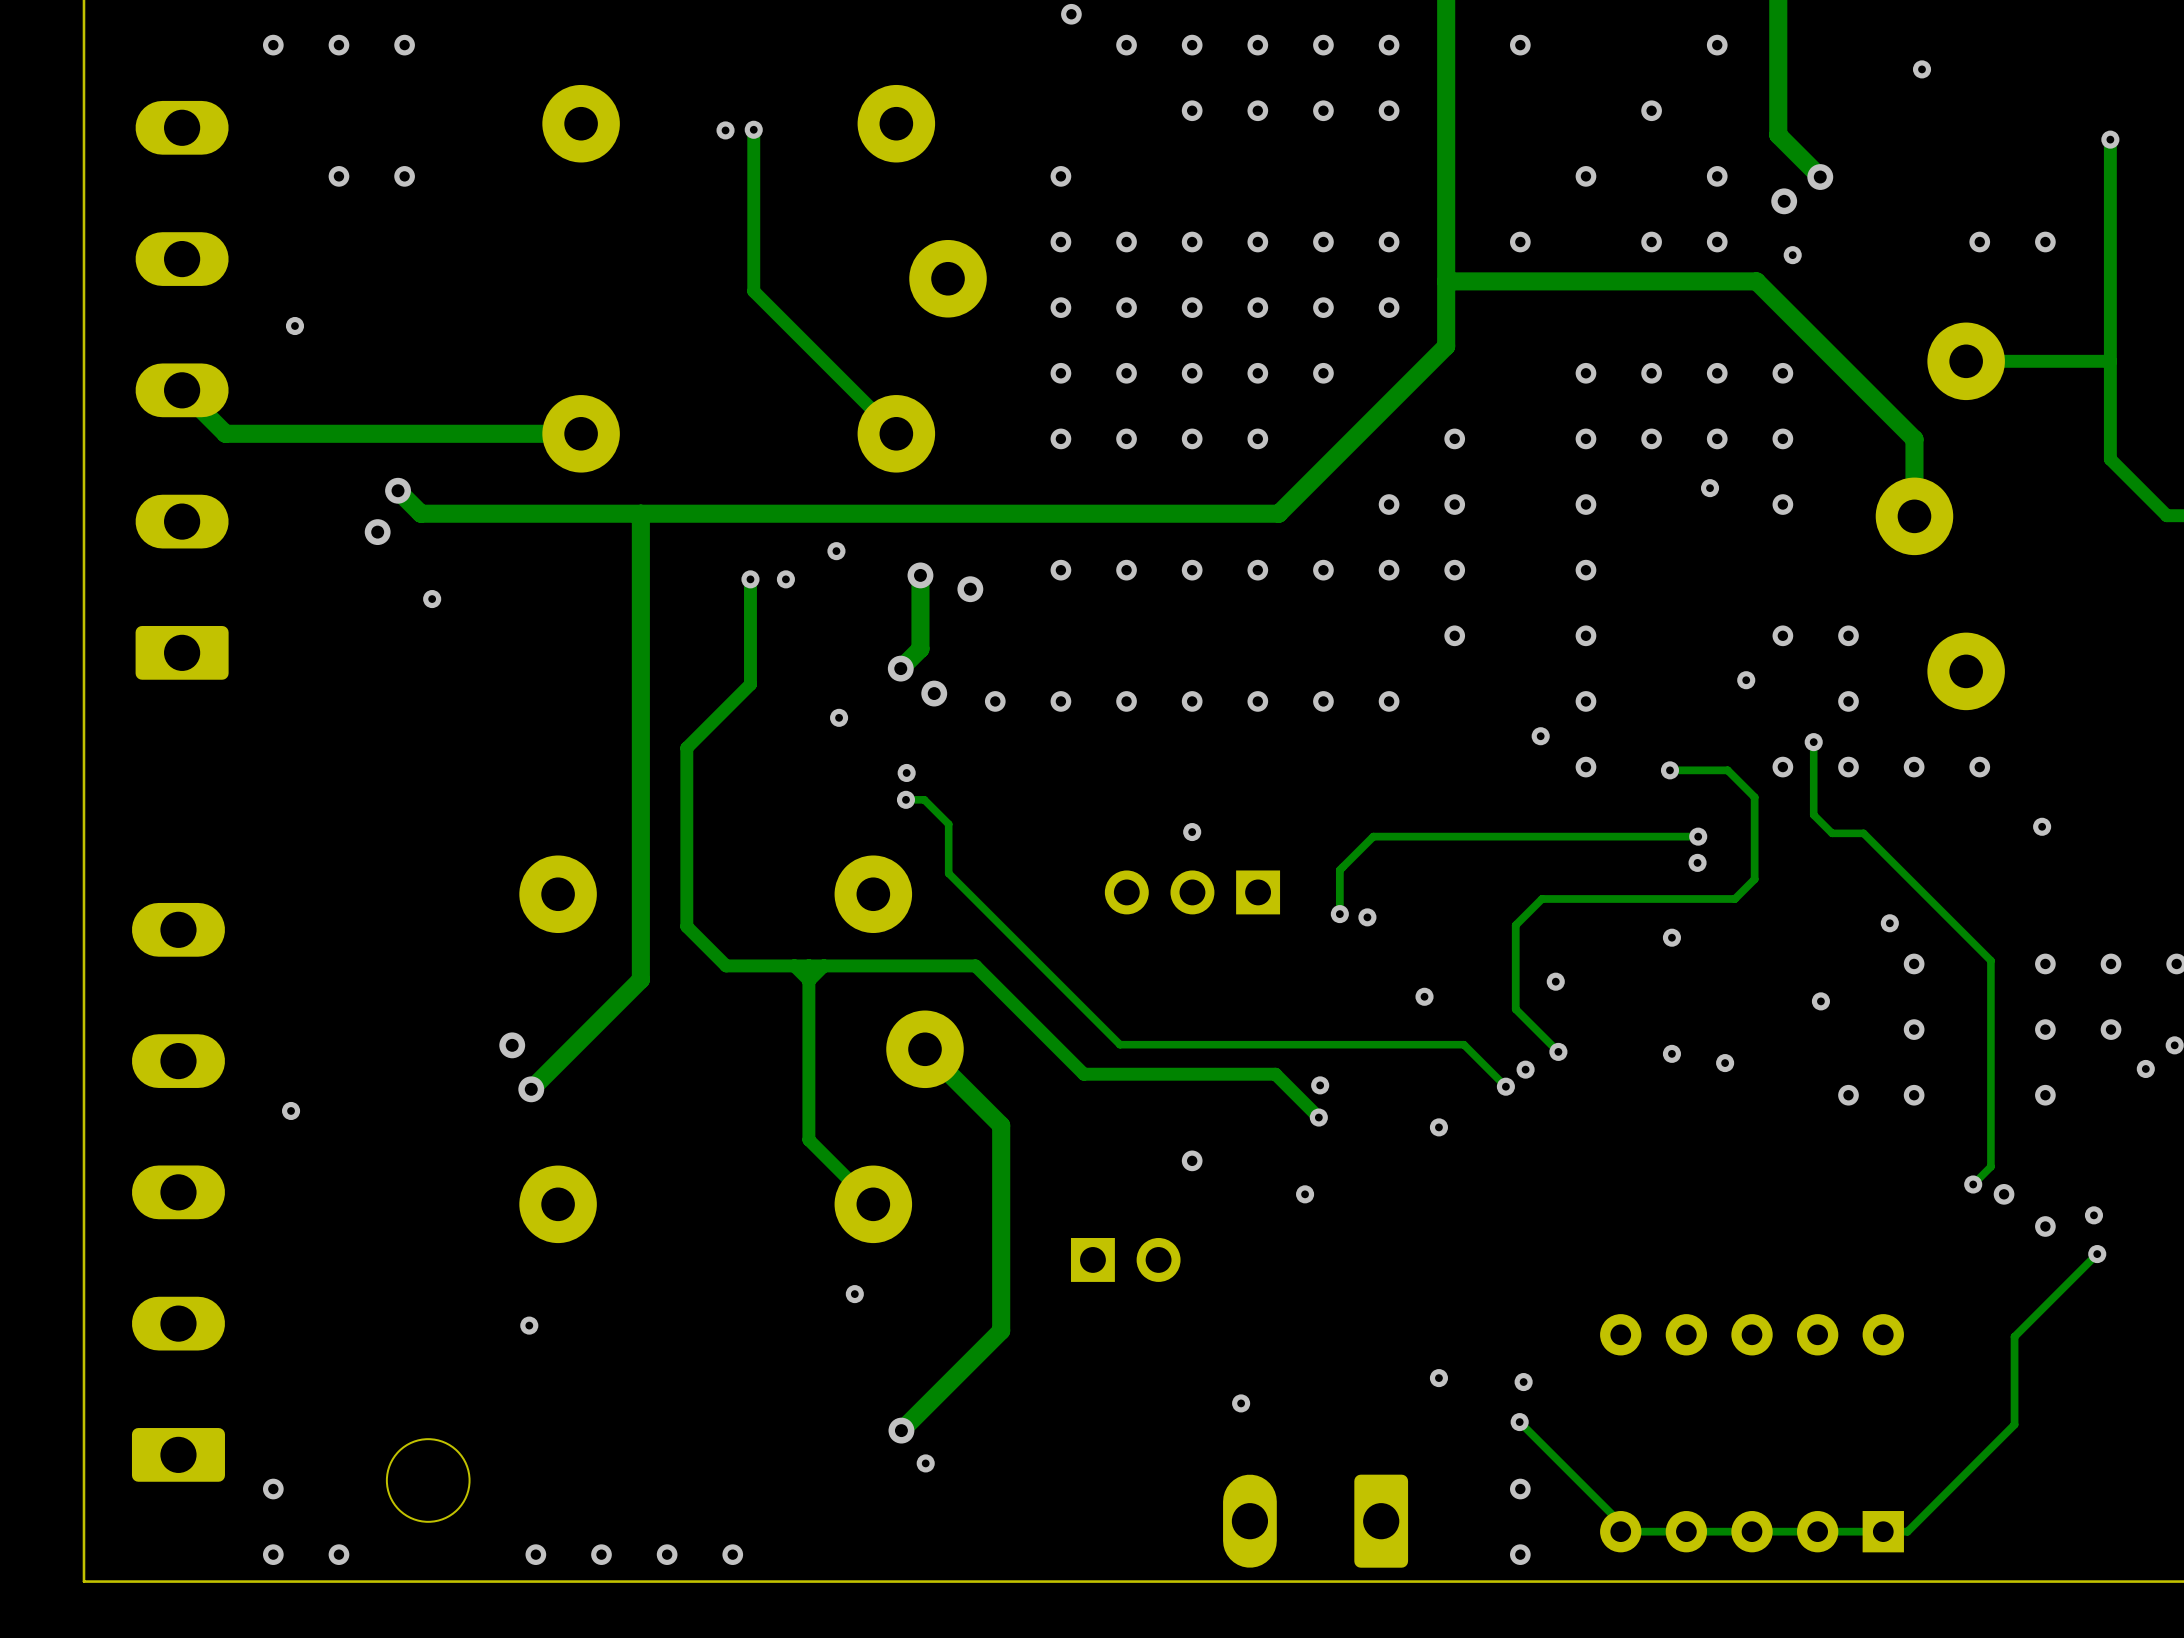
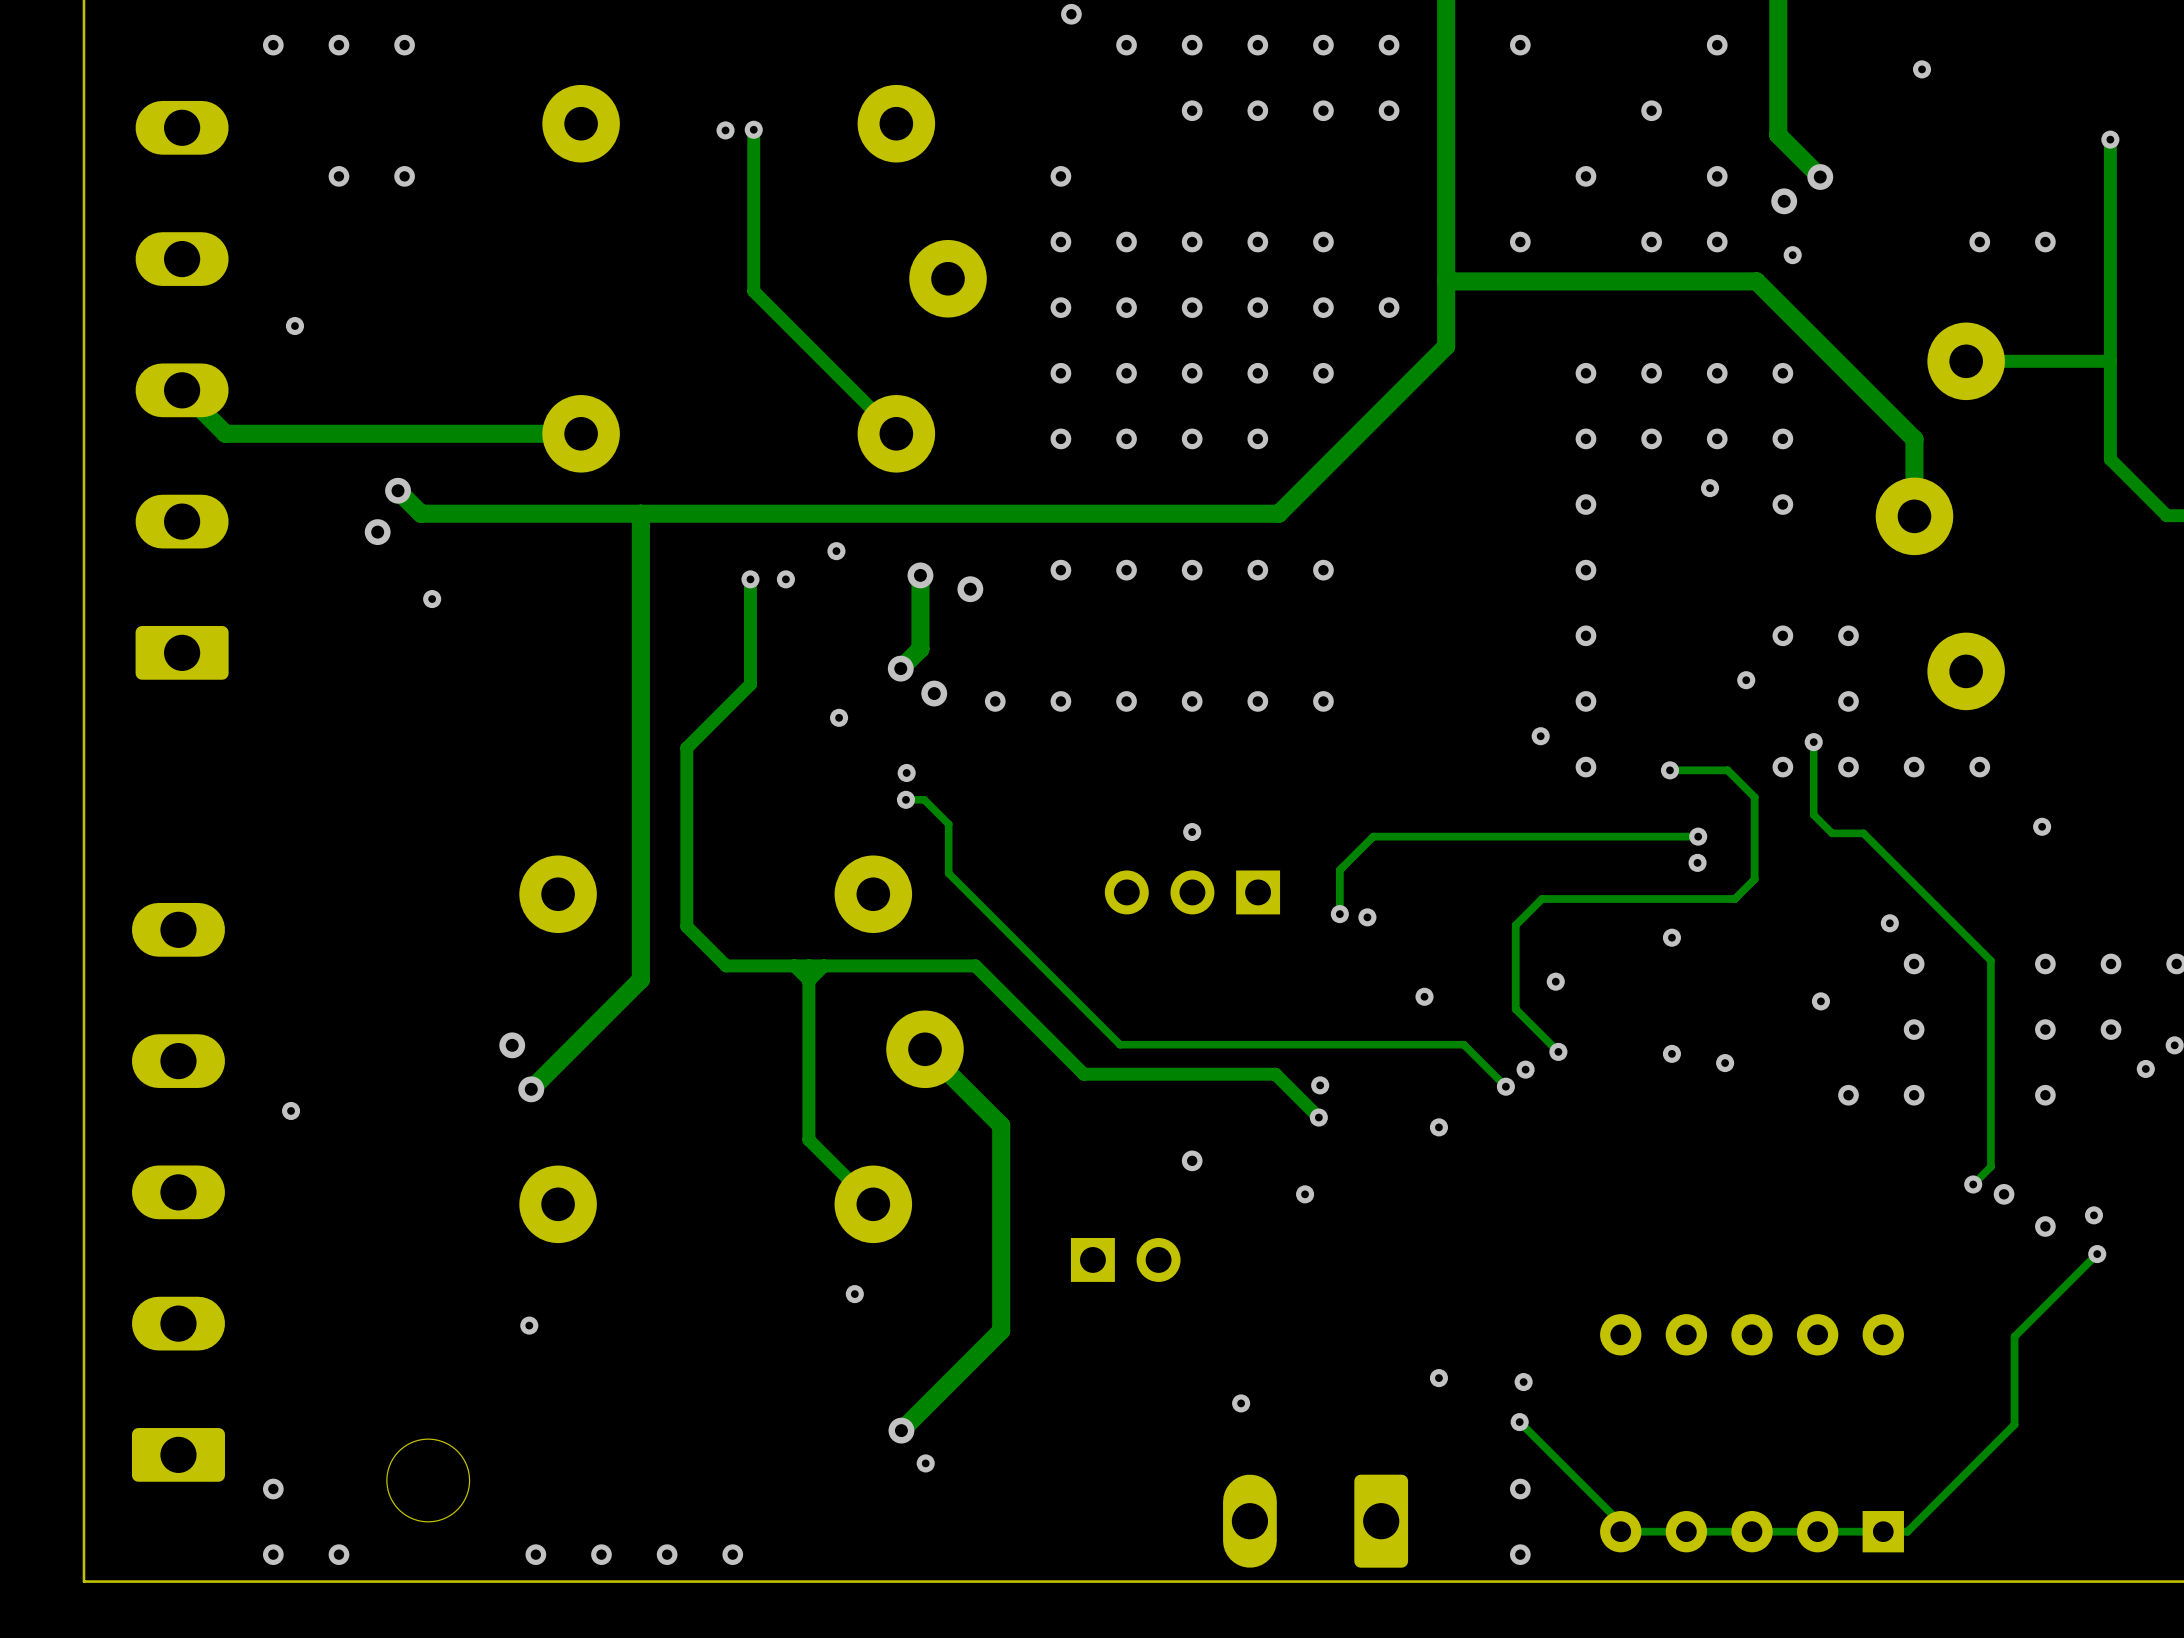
via: (1389, 242) -> none
via: (1454, 438) -> none
via: (1389, 504) -> none
via: (1454, 504) -> none
via: (1389, 570) -> none
via: (1454, 570) -> none
via: (1454, 635) -> none
via: (1389, 701) -> none

